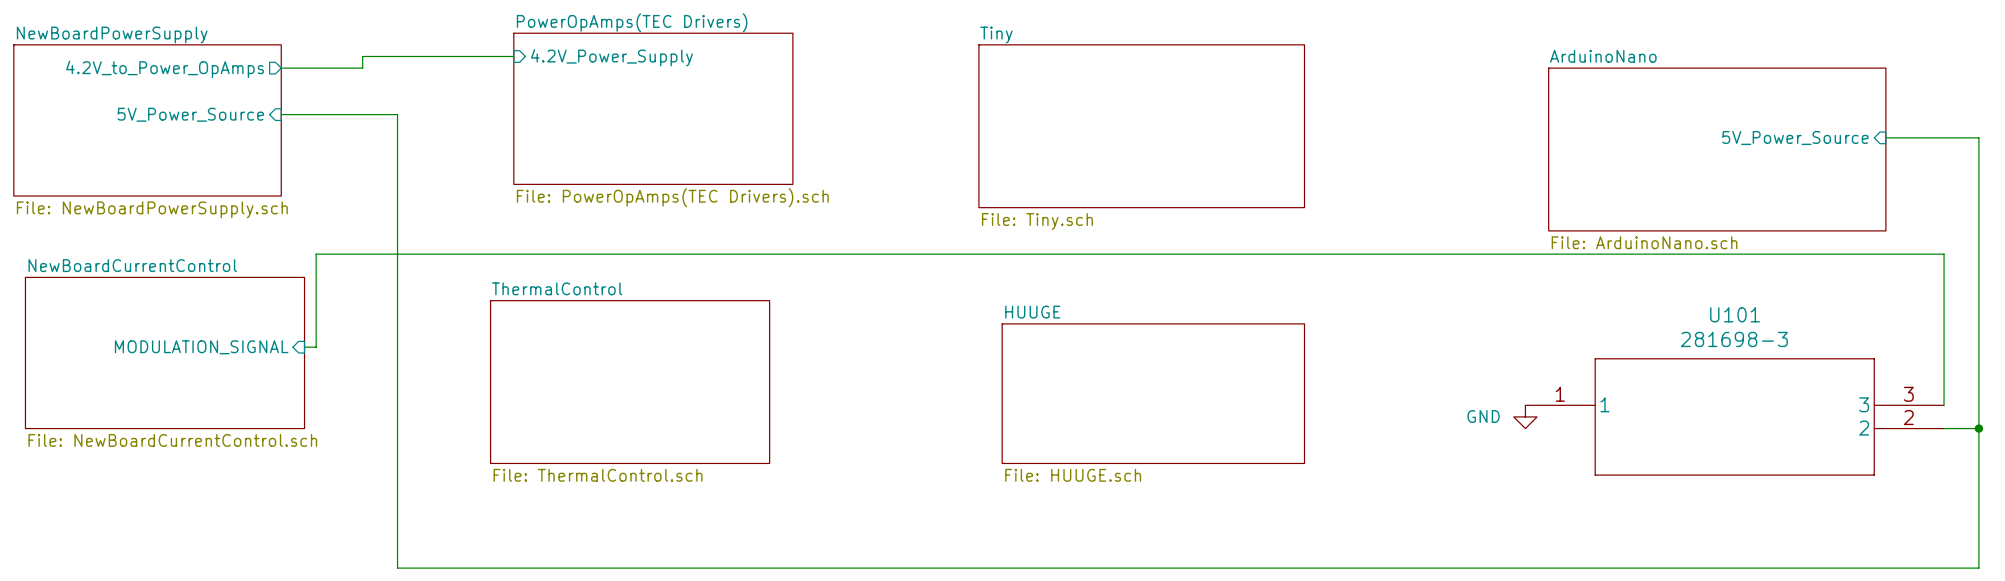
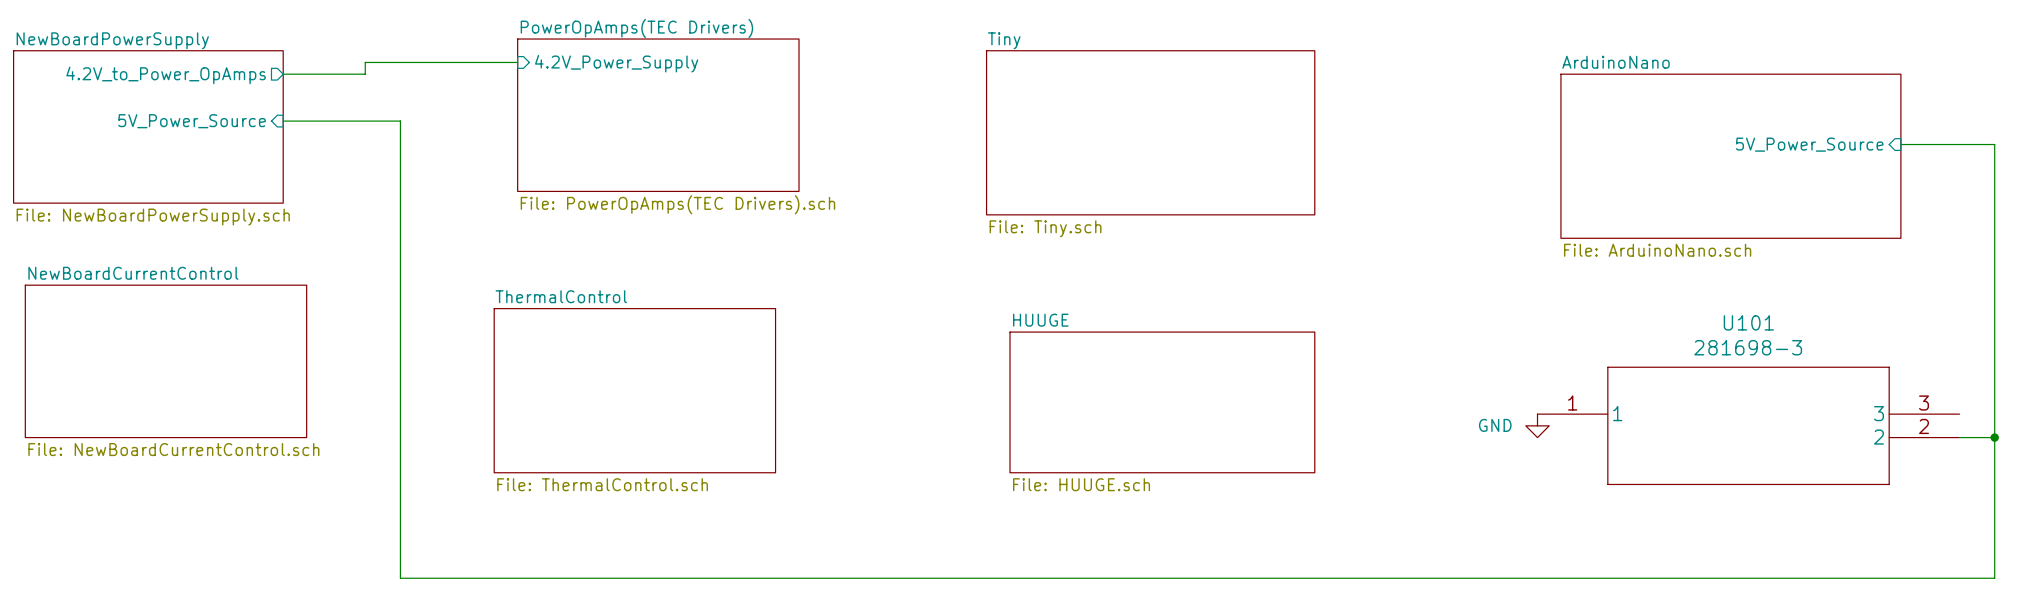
sheet pin: MODULATION_SIGNAL (201, 347) -> none
wire: (304, 347) (316, 347) (316, 254) (1944, 254) (1944, 405) -> none

